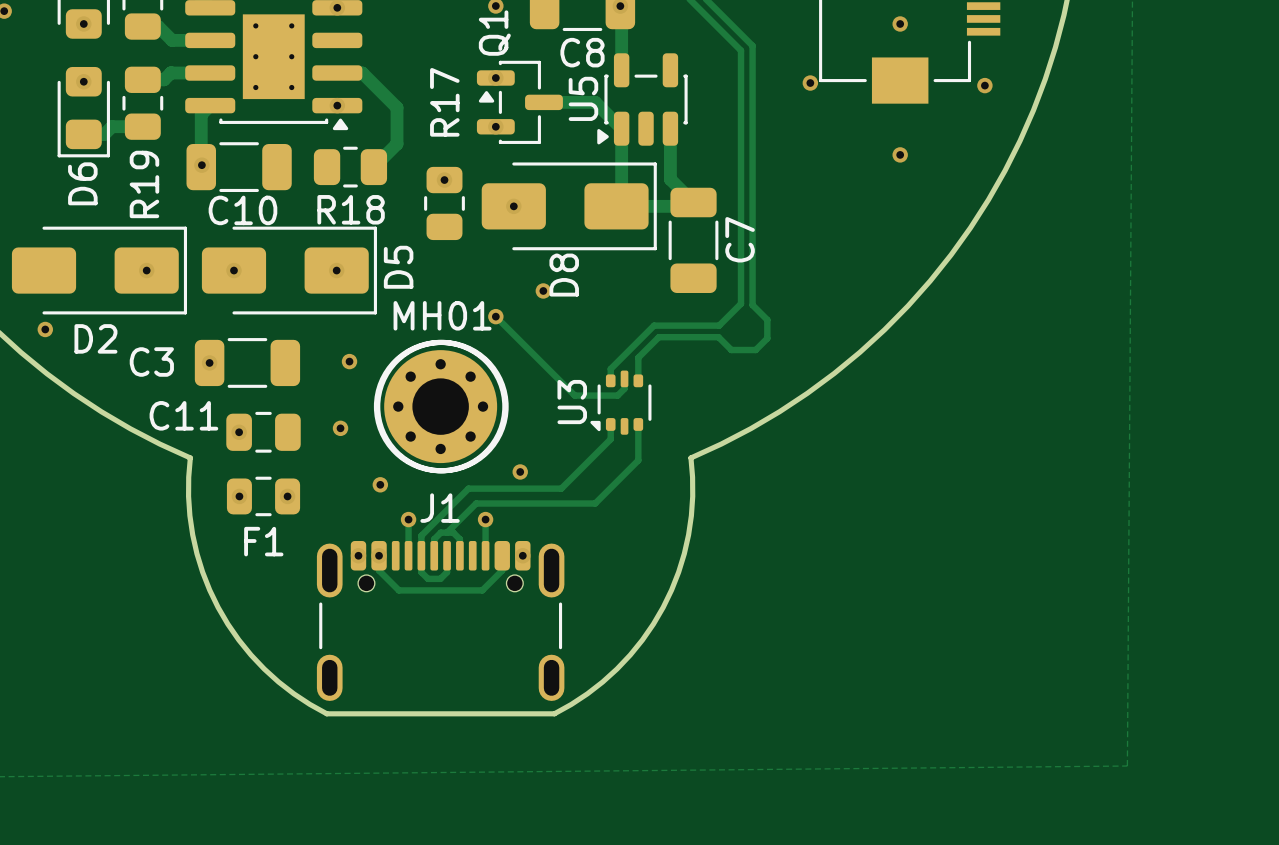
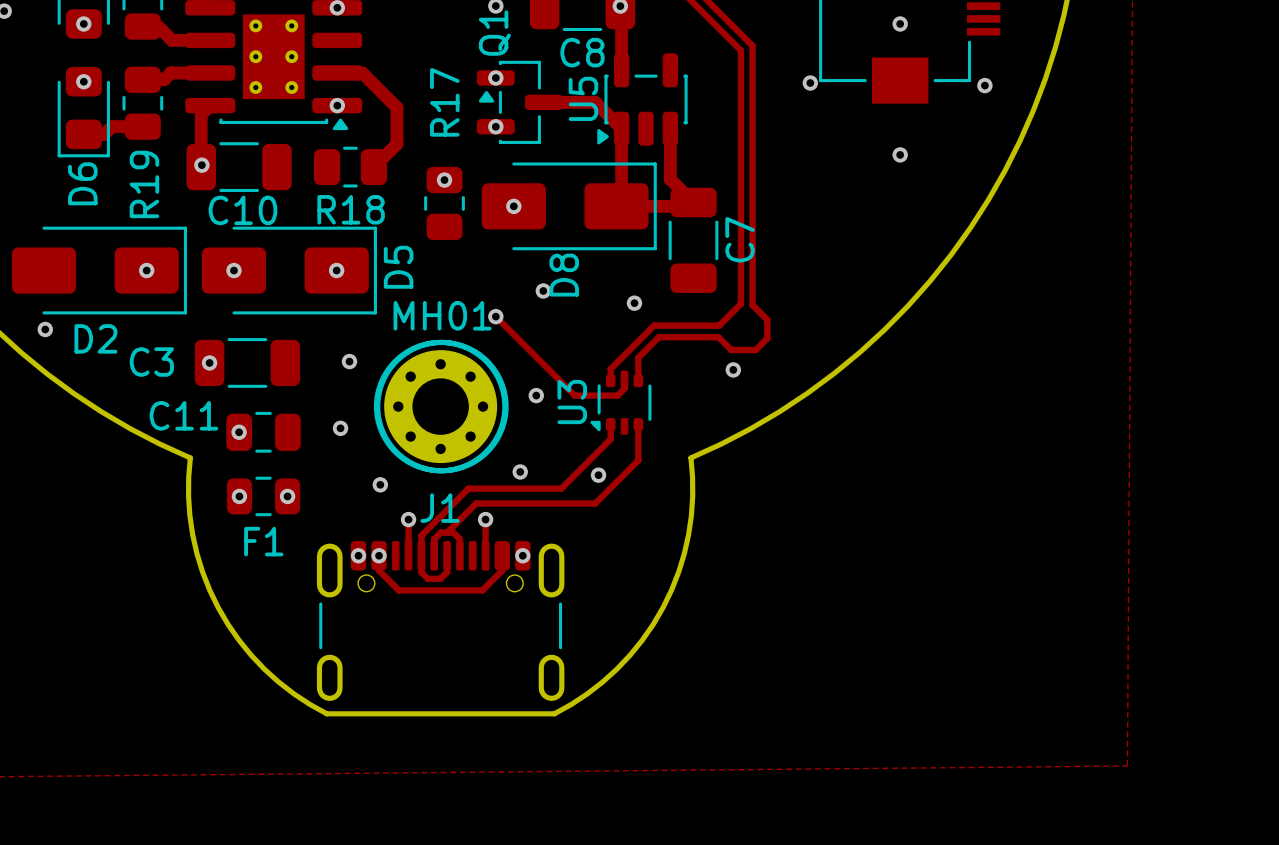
via: none -> (634, 303)
via: none -> (733, 369)
via: none -> (536, 395)
via: none -> (598, 475)

